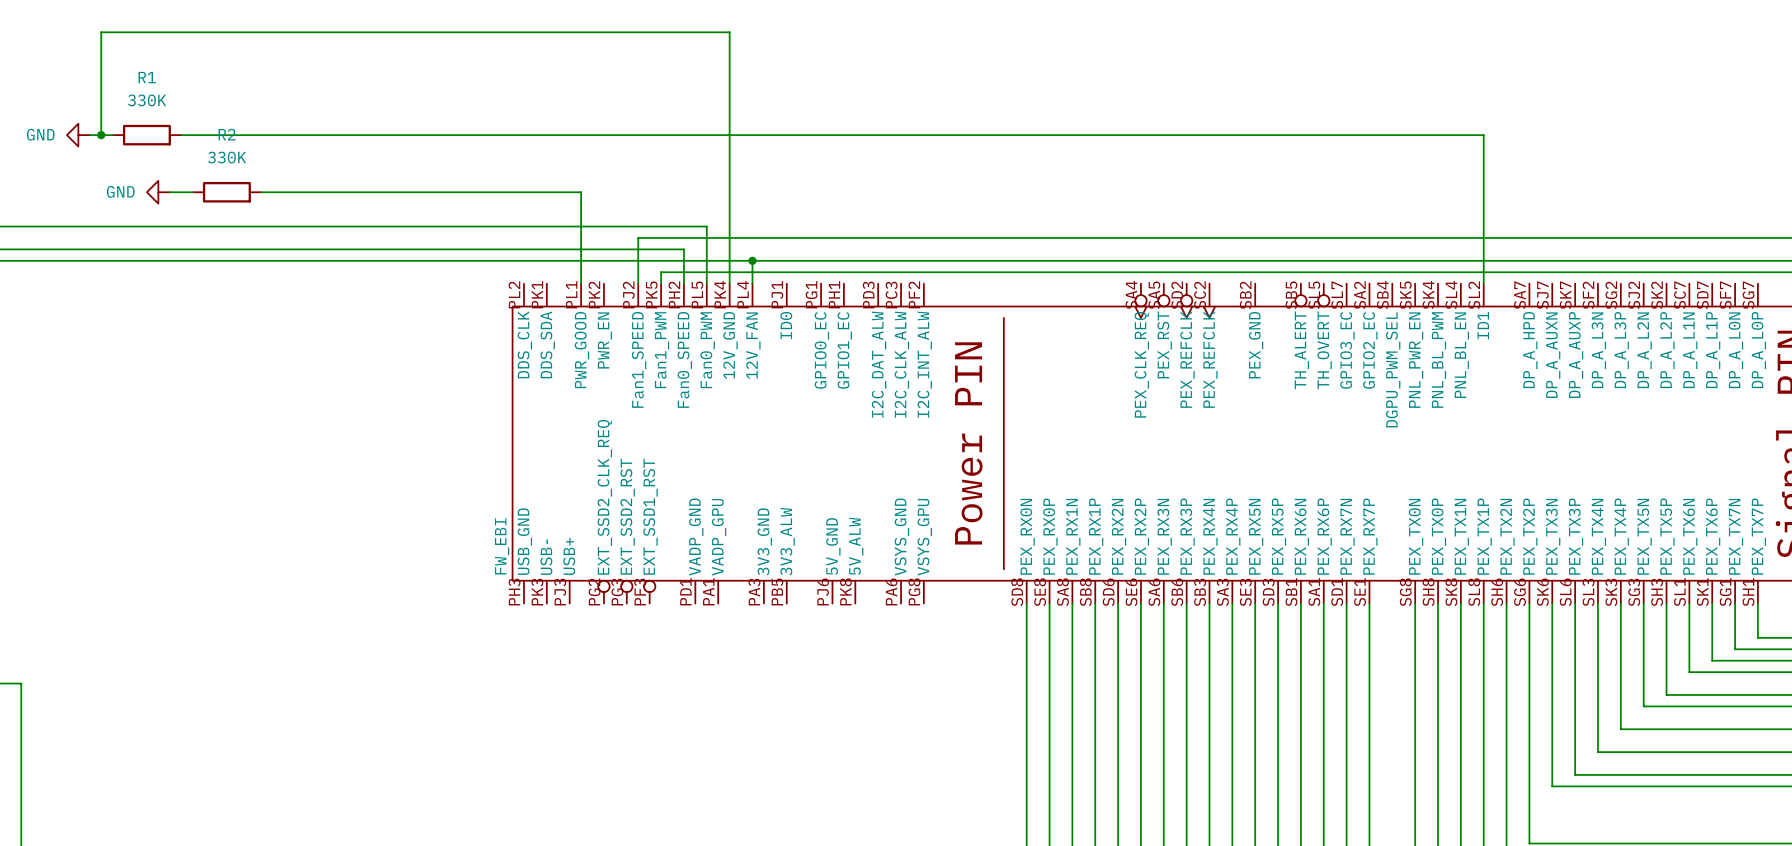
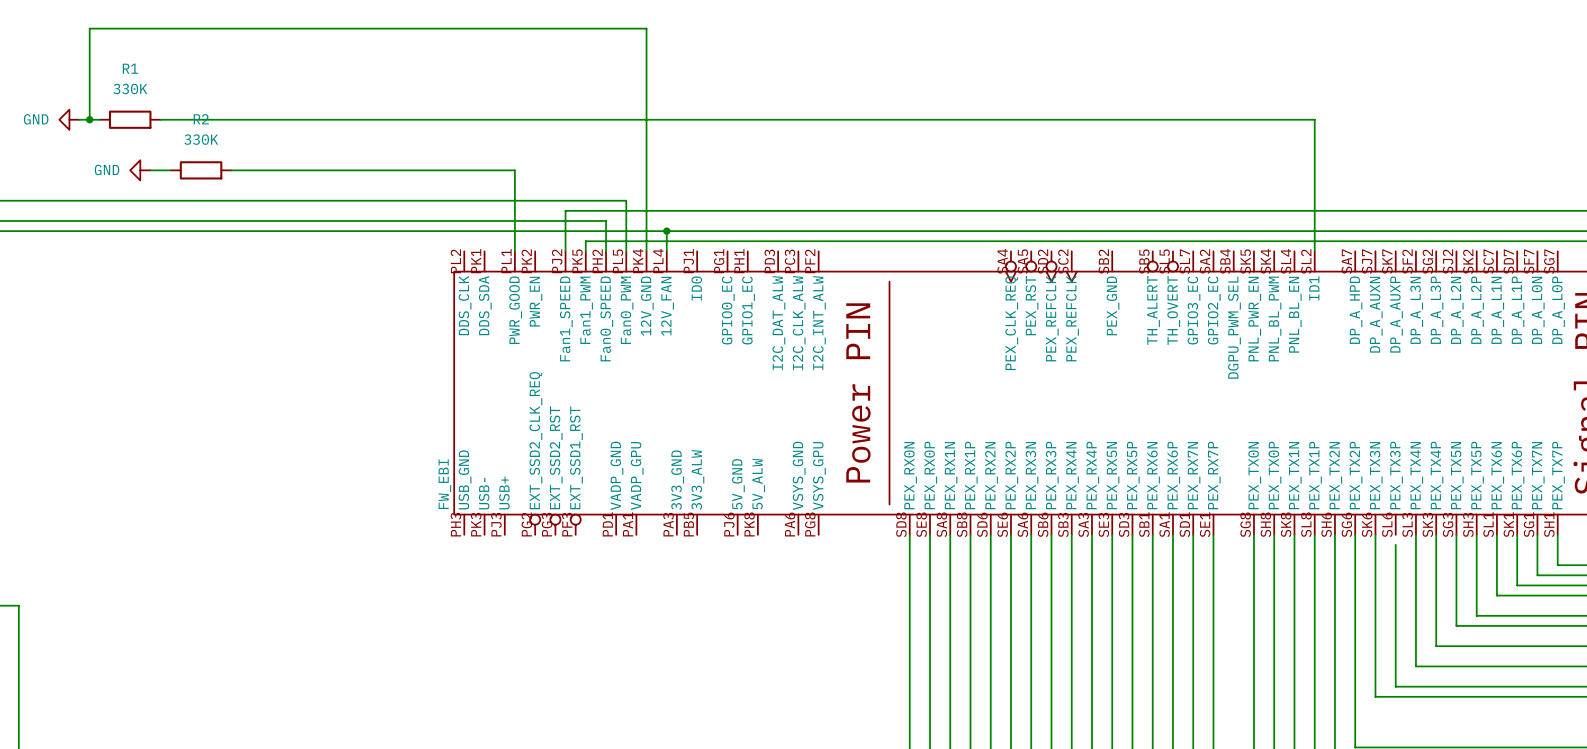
wire: (1575, 603) (1575, 615) -> none

